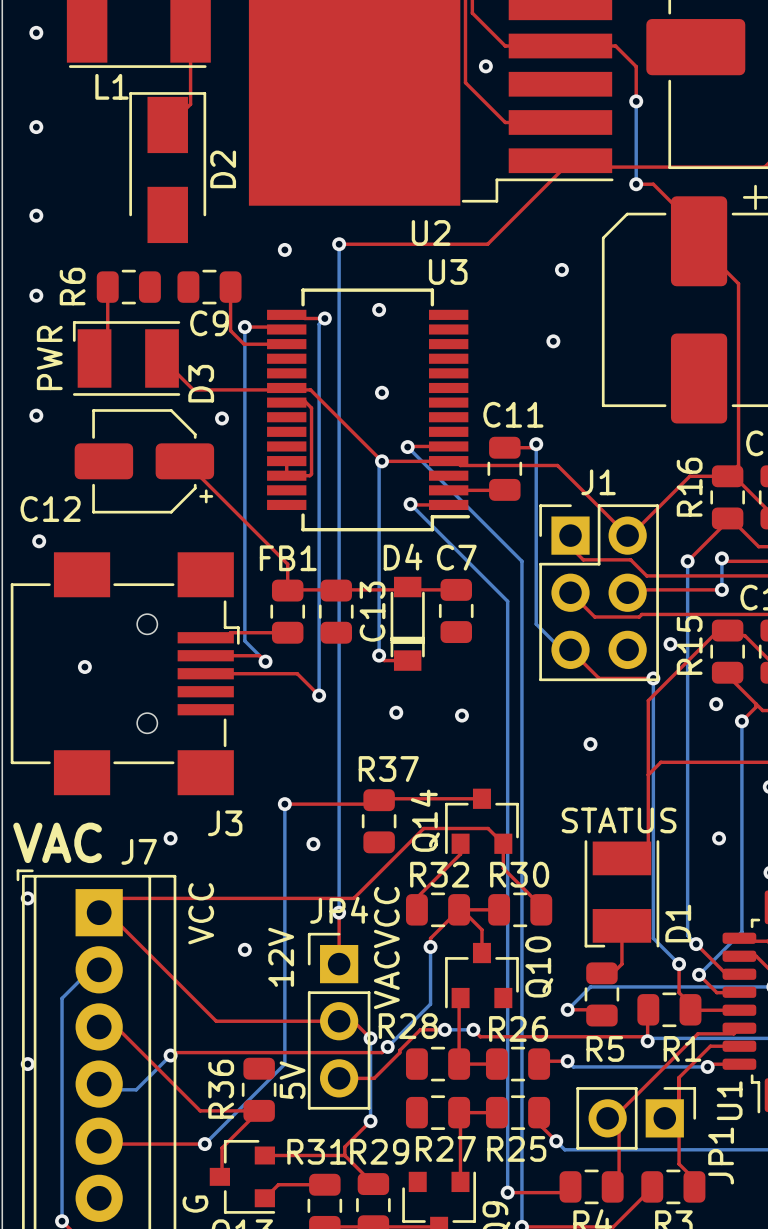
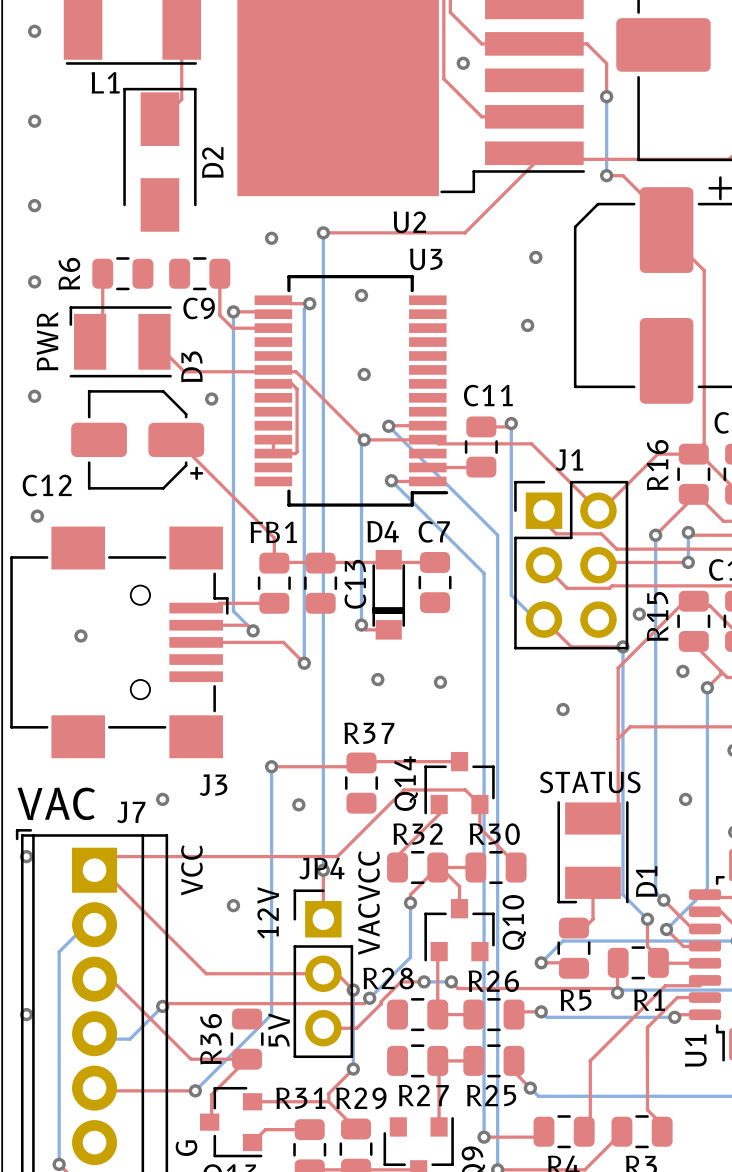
JP1: (636, 1118) -> none

